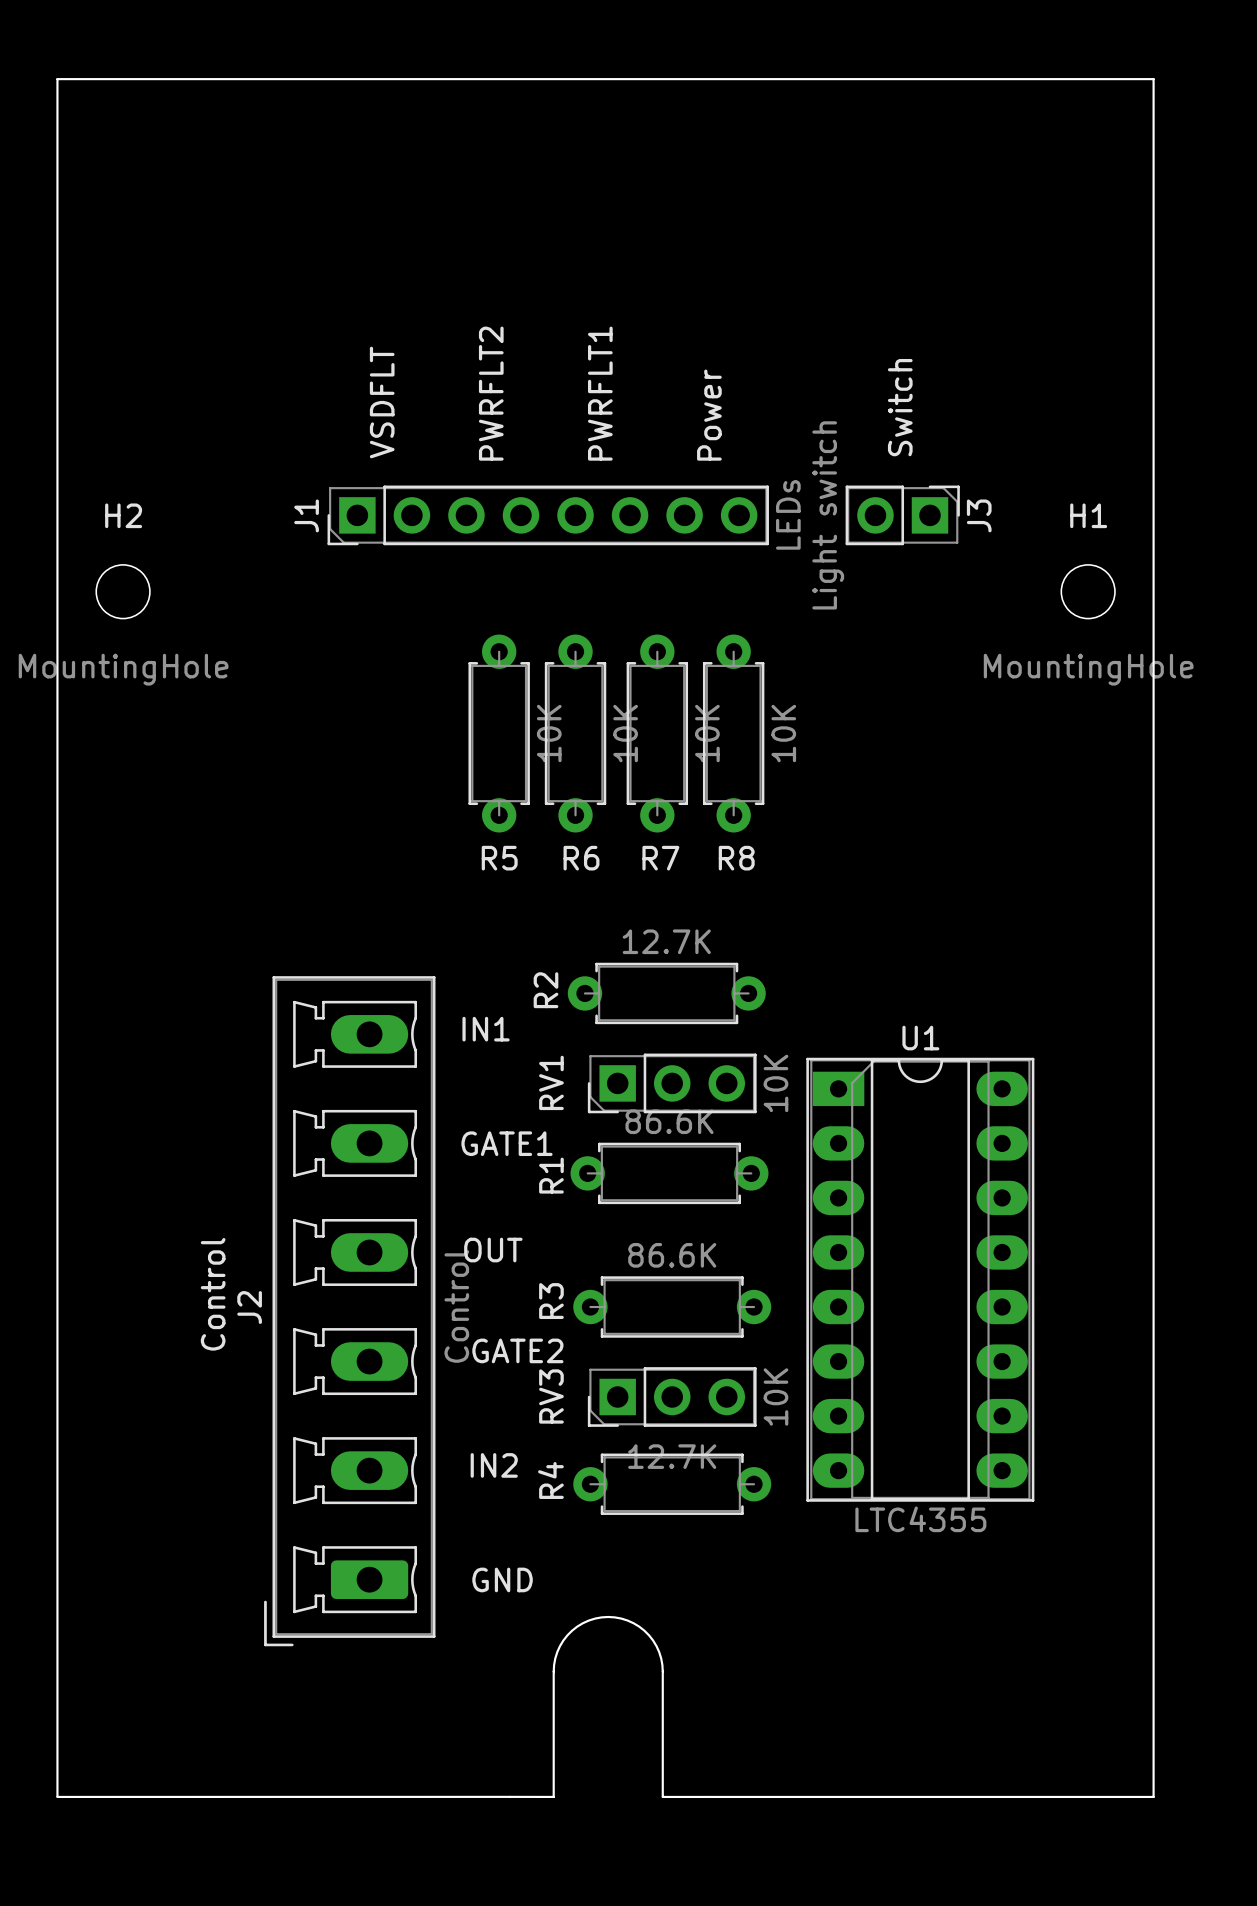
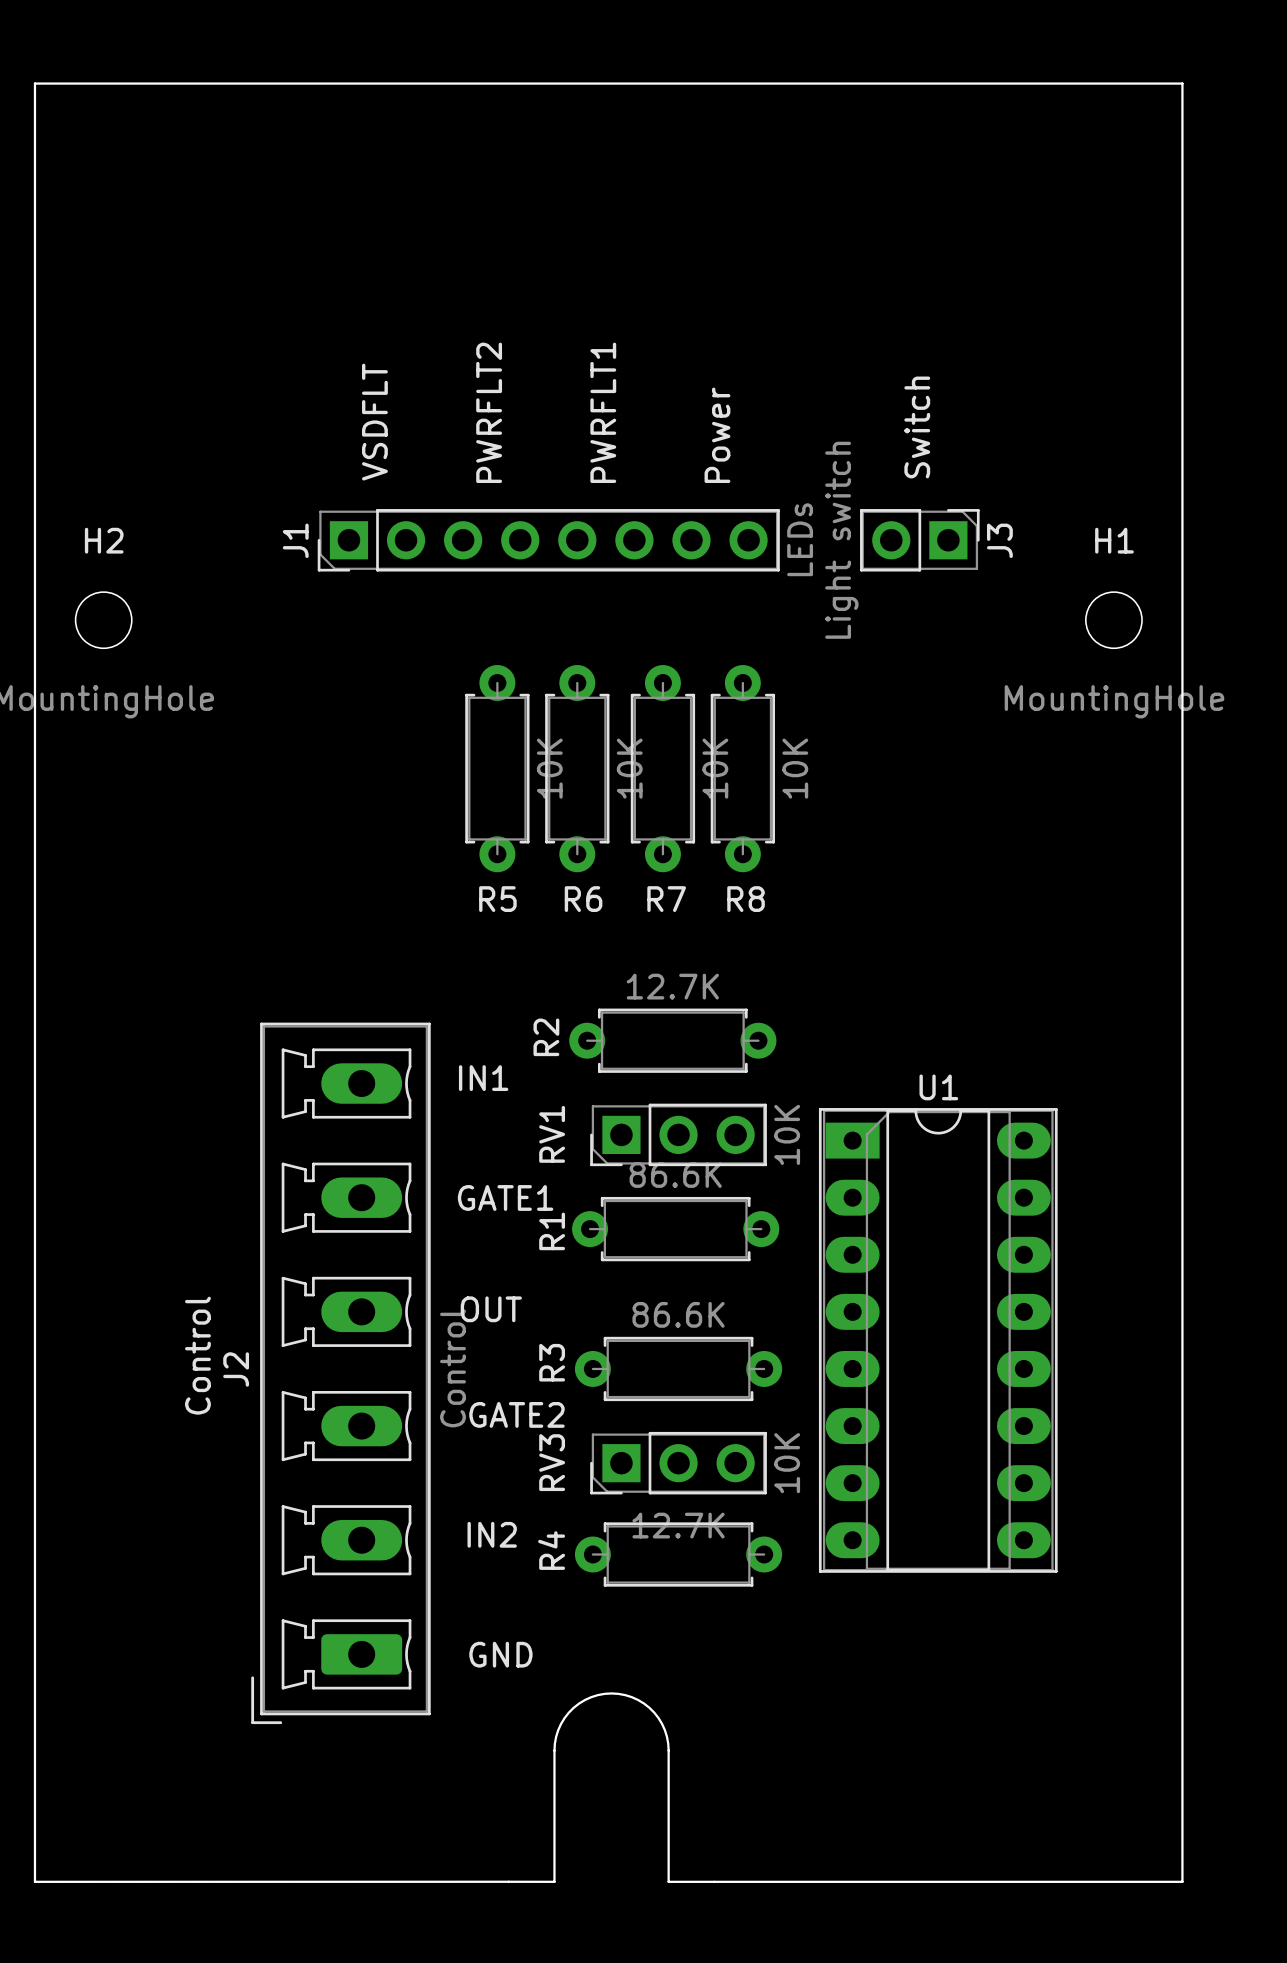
U1 value: LTC4355 (920, 1519) -> none

